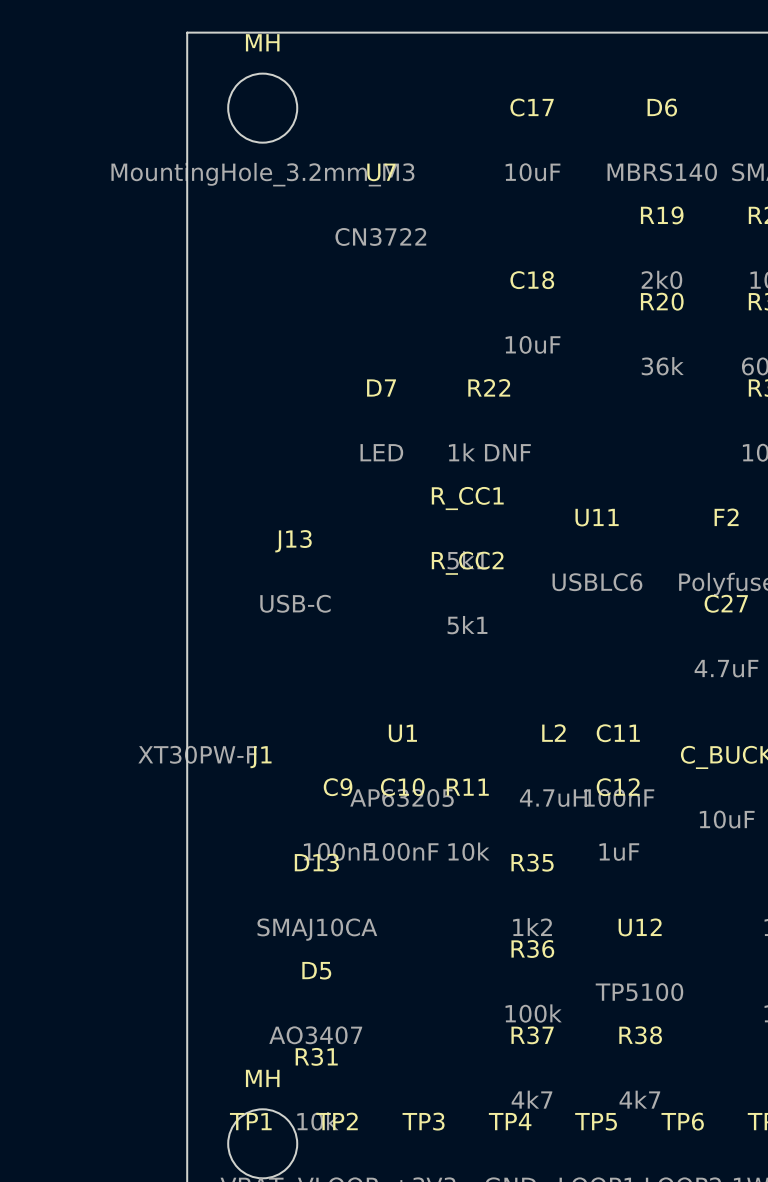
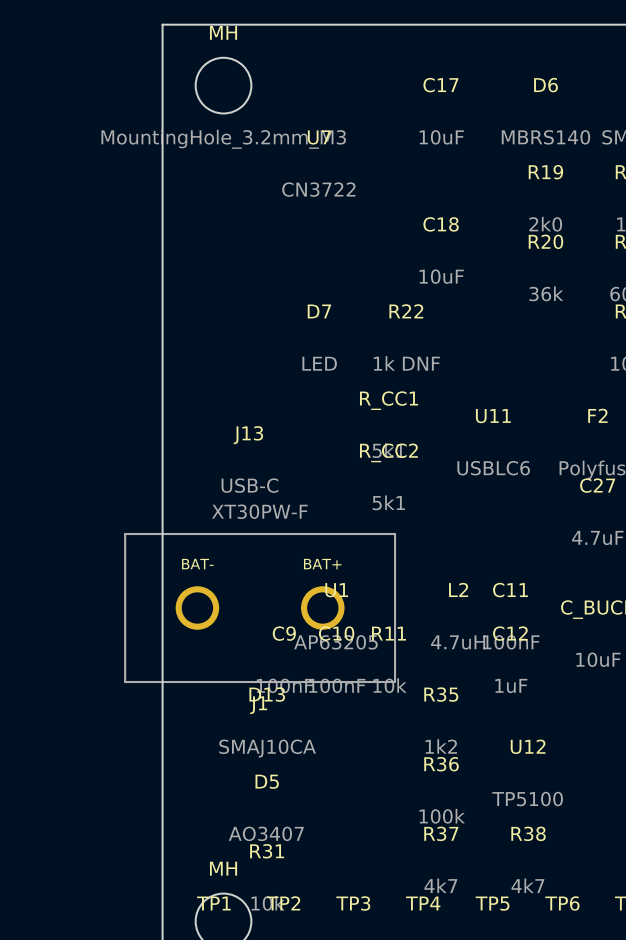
J1 footprint: [138, 745, 272, 769] -> [124, 532, 397, 684]
J1 value position: XT30PW-F (197, 754) -> XT30PW-F (259, 511)
J1 name position: J1 (261, 757) -> J1 (258, 705)

